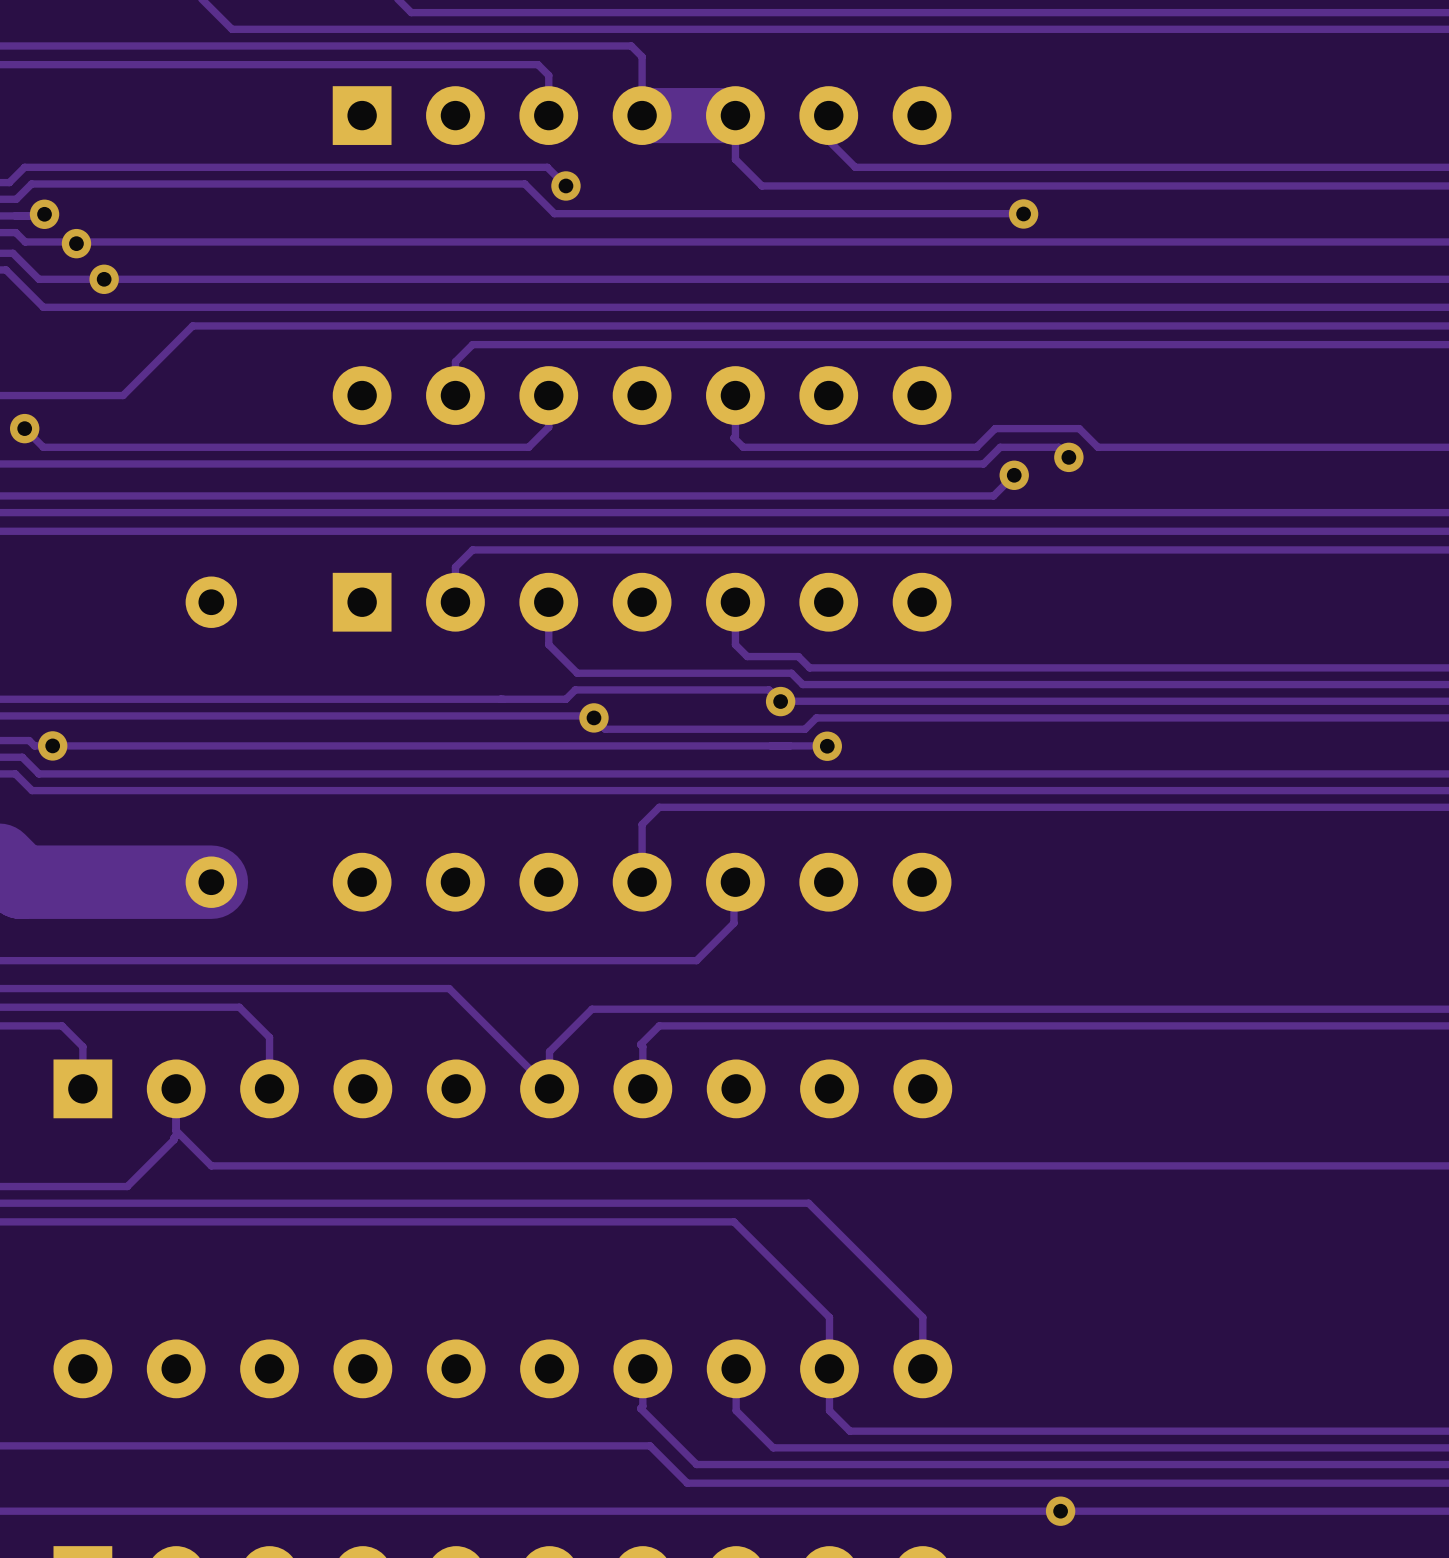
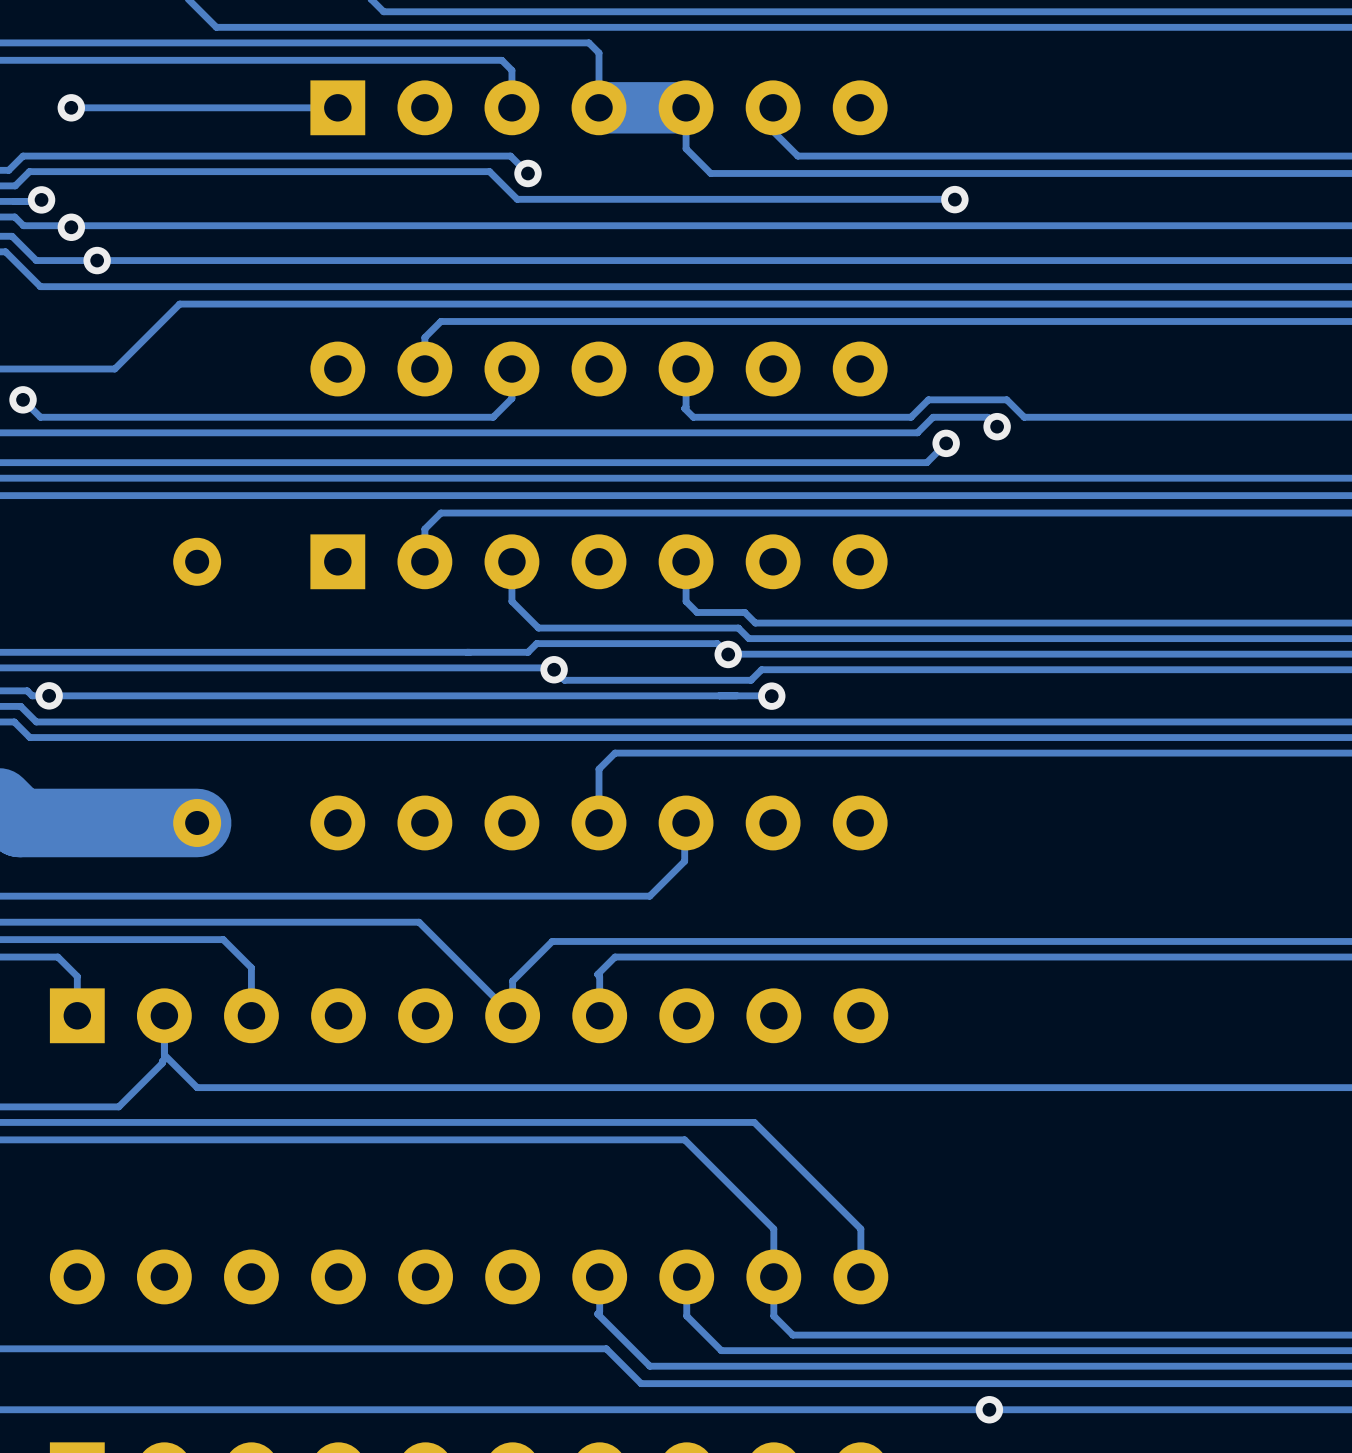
via: none -> (71, 107)
track: none -> (337, 107) (71, 107)

